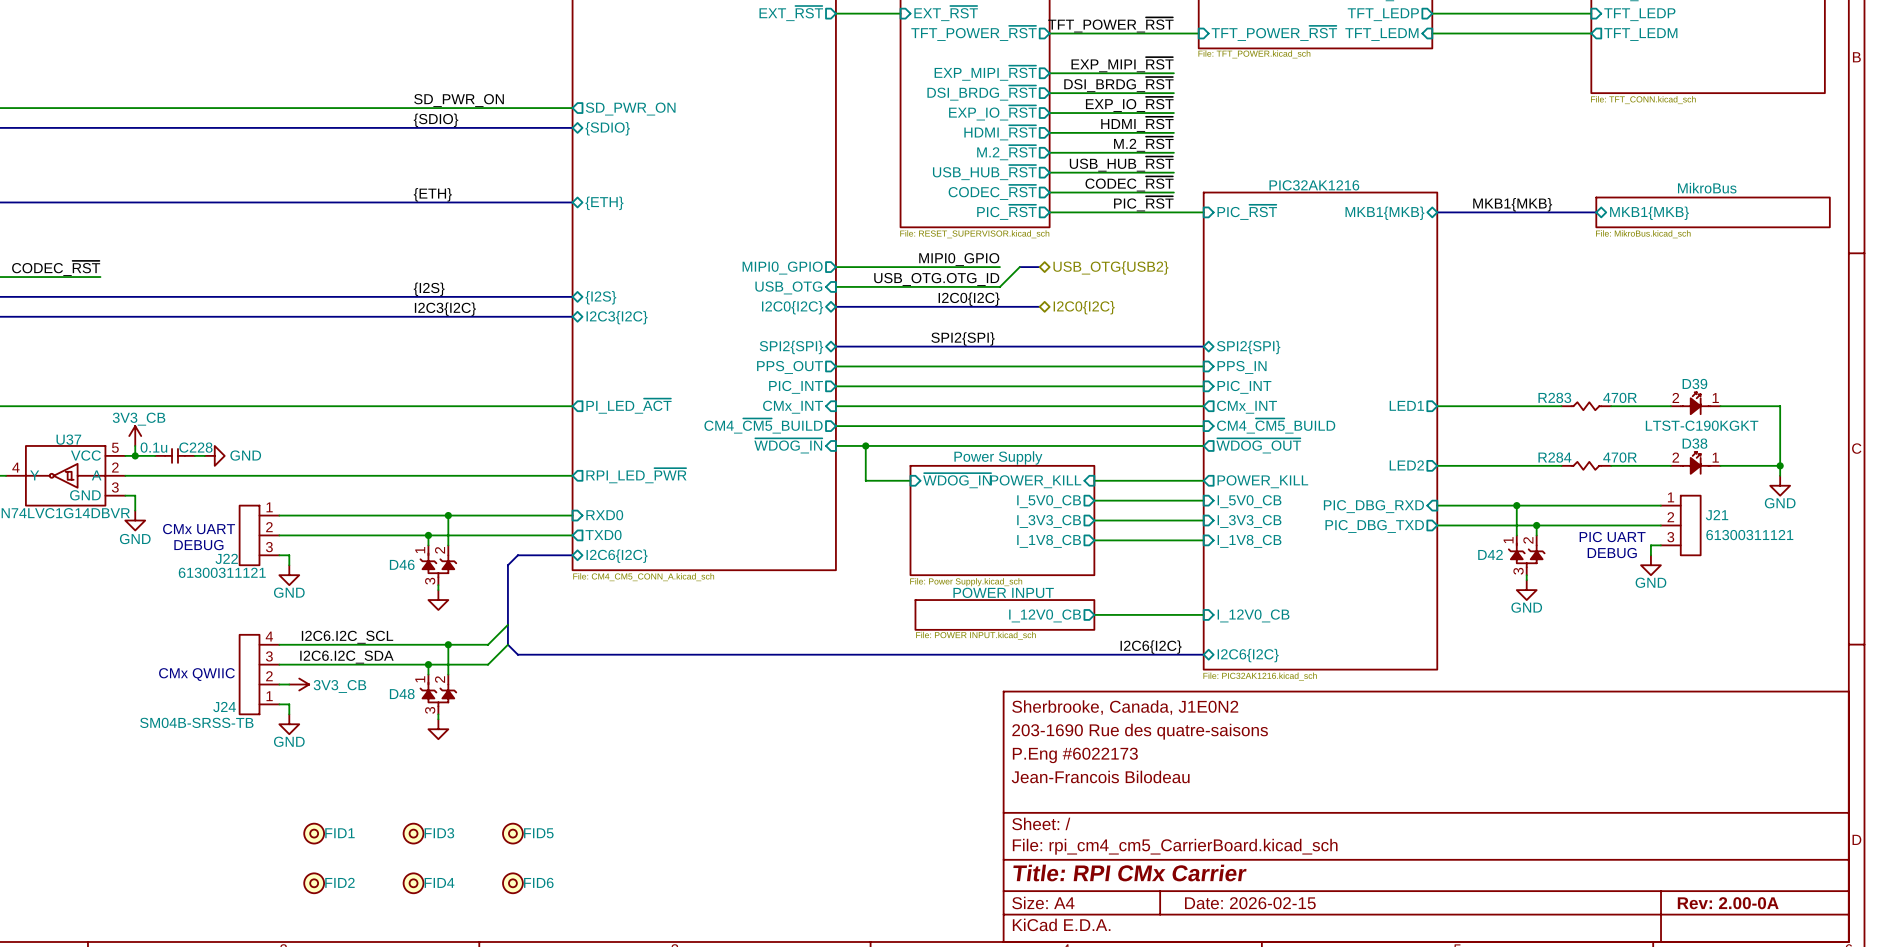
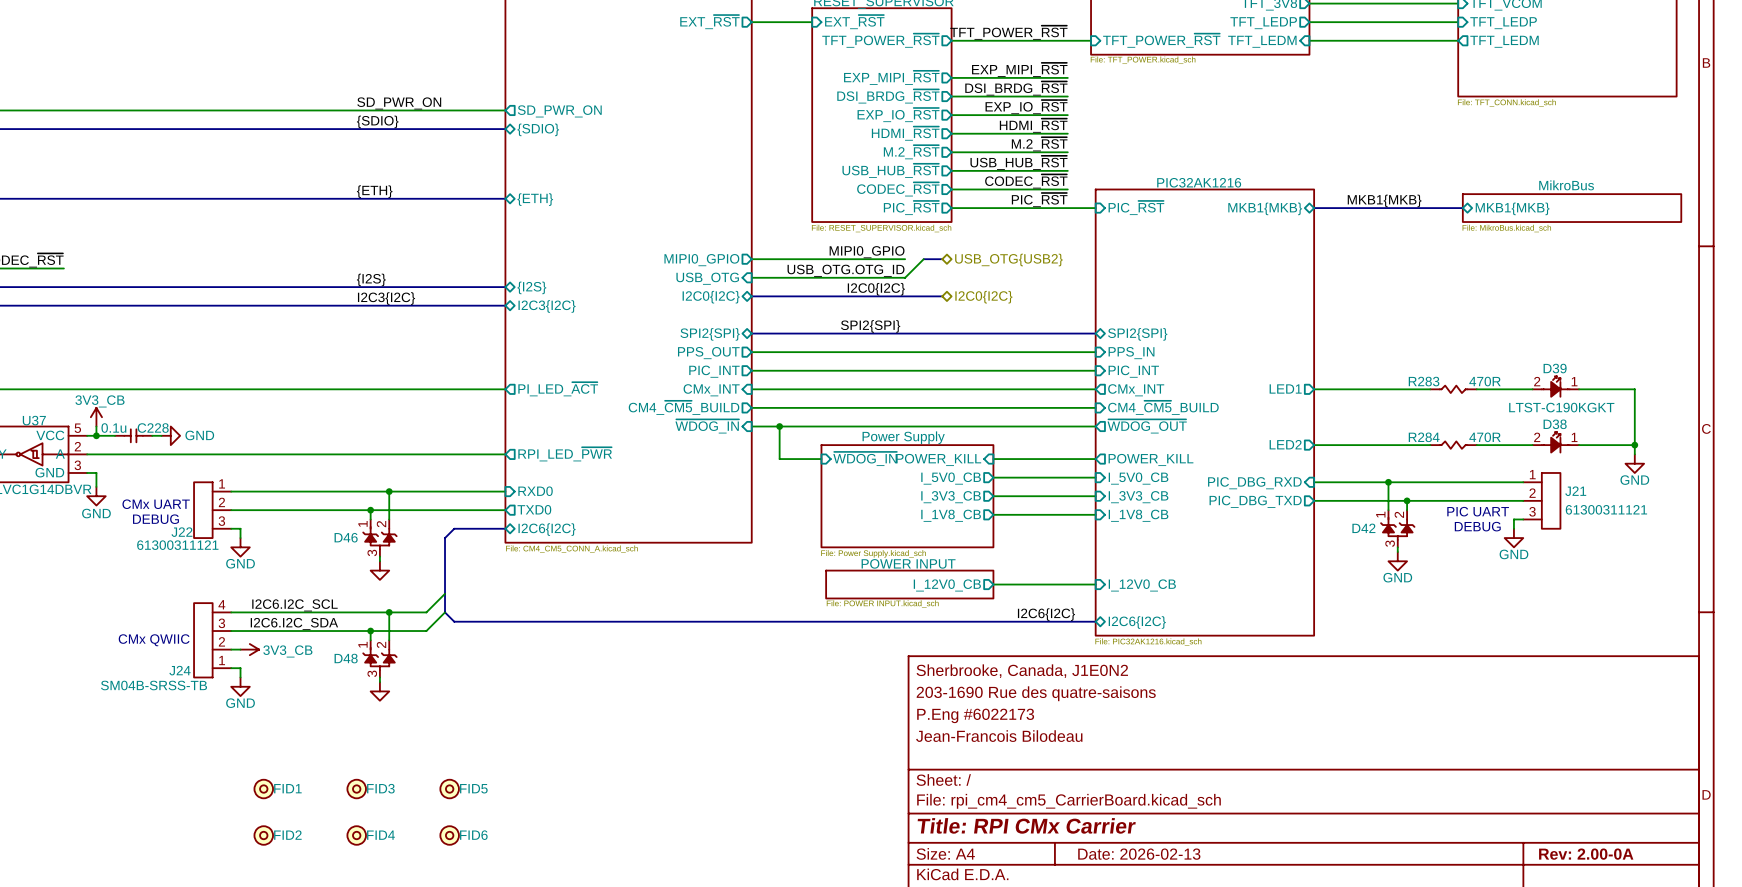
title block: Date: 2026-02-15 (1250, 903) -> Date: 2026-02-13 (1139, 854)

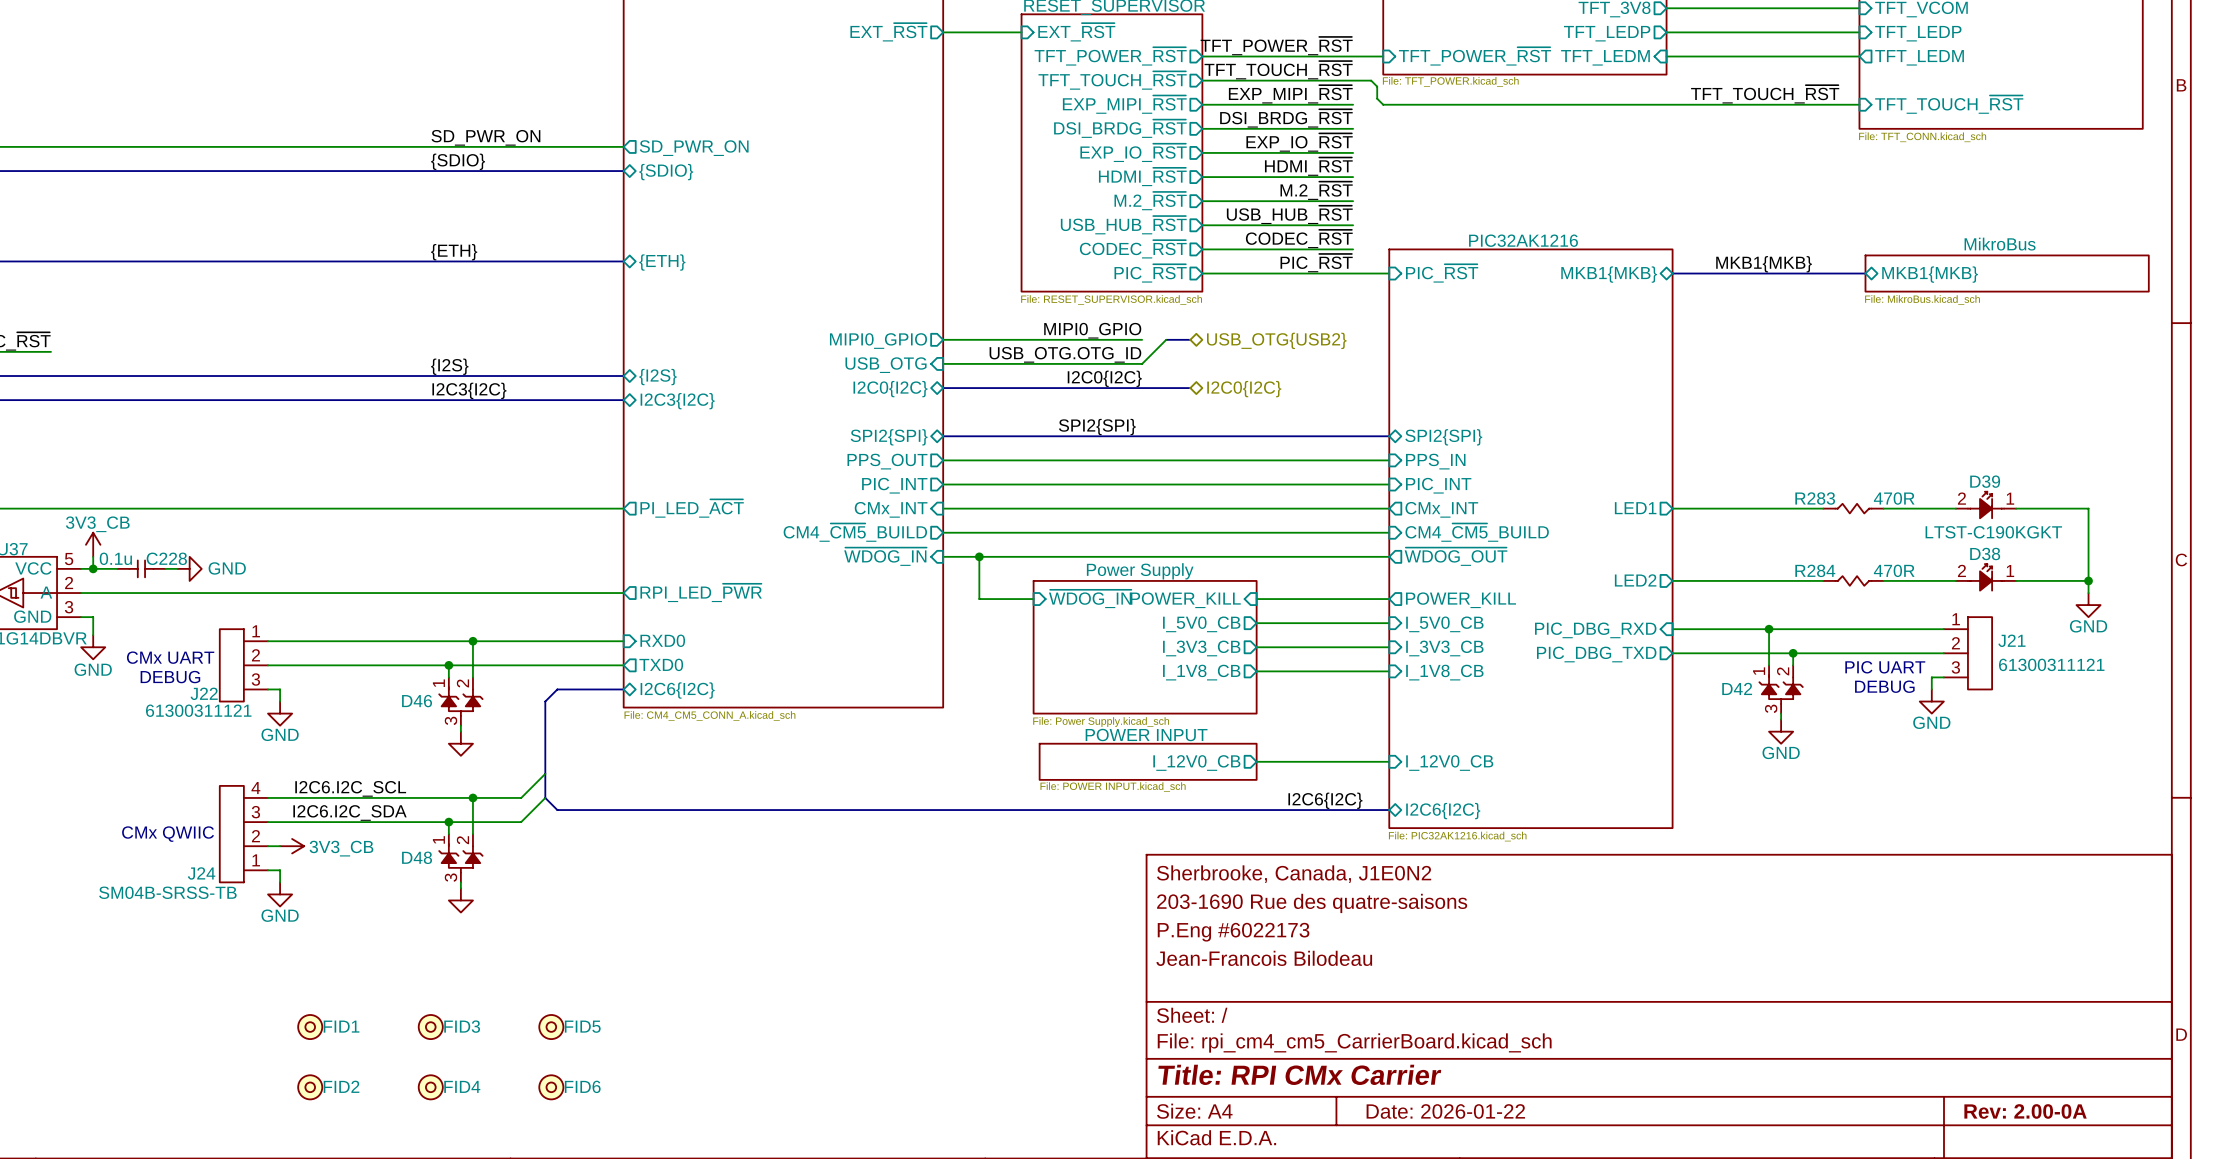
label: none -> TFT_TOUCH_~{RST} (1278, 70)
sheet pin: none -> TFT_TOUCH_~{RST} (1112, 80)
wire: none -> (1202, 80) (1371, 80) (1377, 86) (1377, 98) (1383, 104) (1859, 104)
label: none -> TFT_TOUCH_~{RST} (1765, 94)
sheet pin: none -> TFT_TOUCH_~{RST} (1949, 104)
title block: Date: 2026-02-13 (1139, 854) -> Date: 2026-01-22 (1445, 1111)

